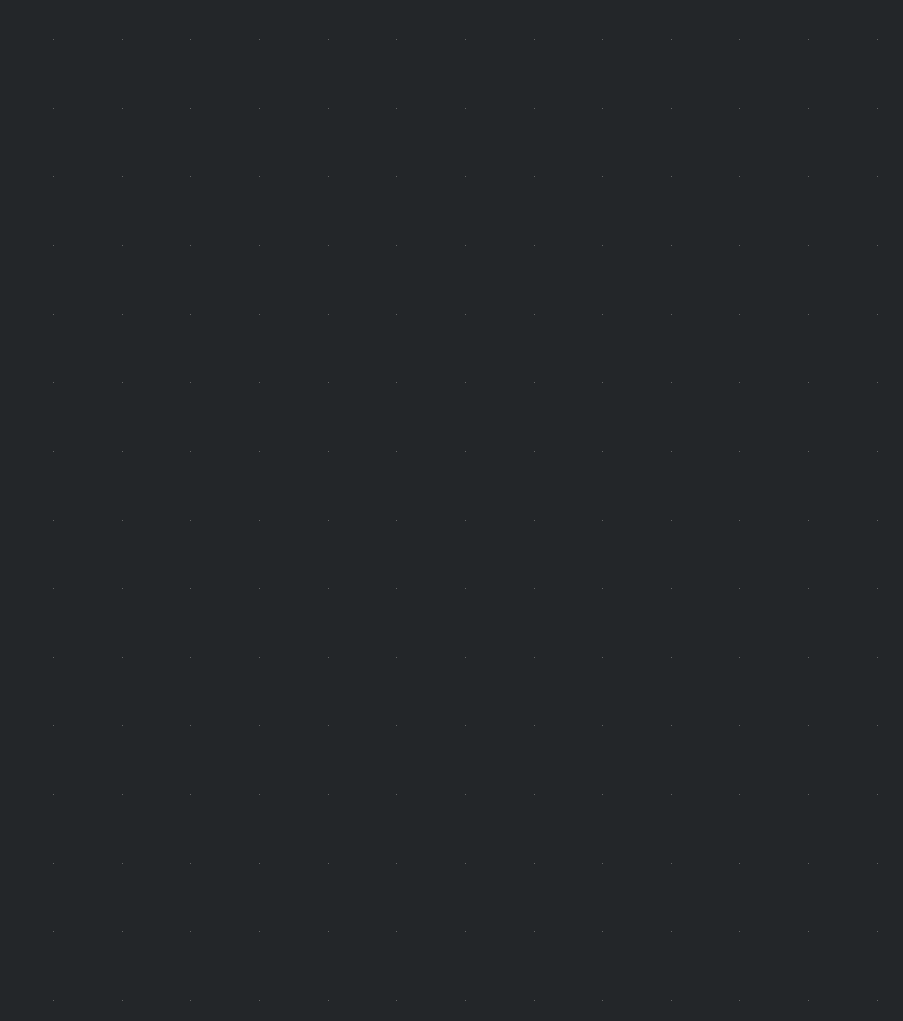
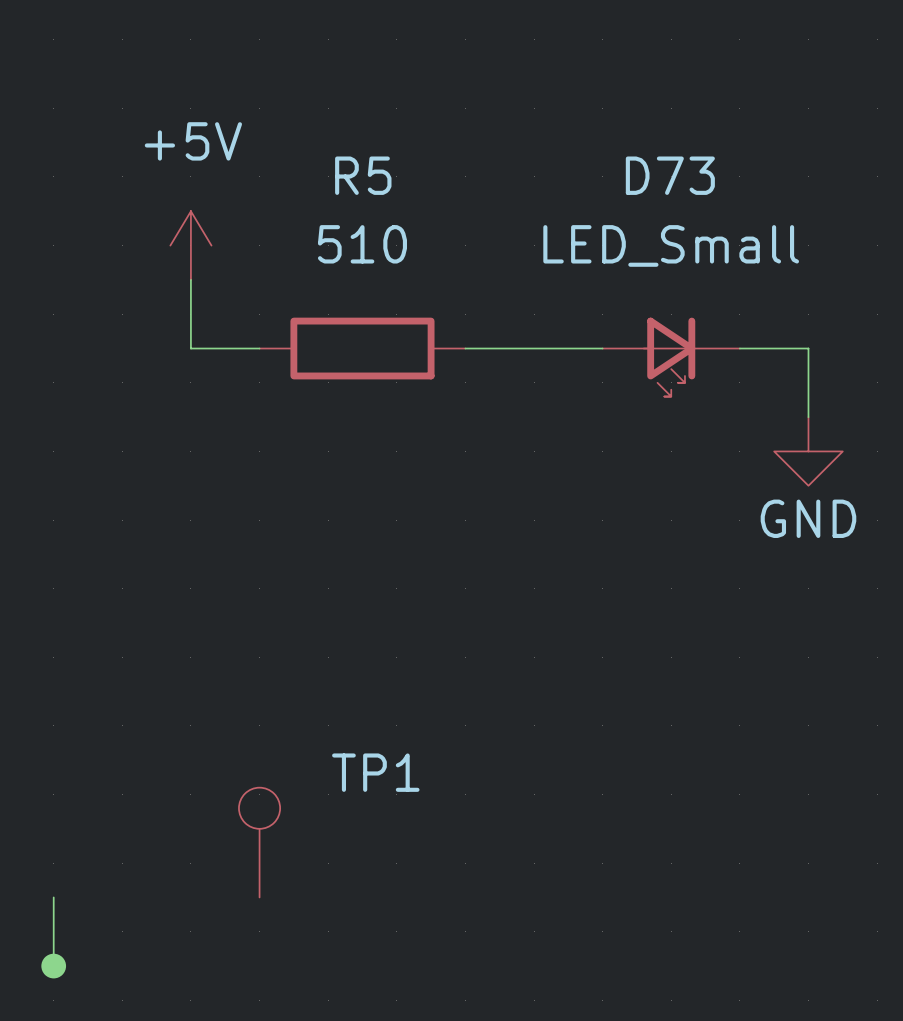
power symbol: none -> +5V (190, 245)
wire: none -> (190, 279) (190, 348) (259, 348)
R5: none -> 510 (362, 348)
wire: none -> (465, 348) (602, 348)
wire: none -> (739, 348) (808, 348) (808, 417)
D73: none -> LED_Small (671, 357)
power symbol: none -> GND (808, 451)
TP1: none -> (259, 842)
wire: none -> (53, 897) (53, 966)
junction: none -> (53, 966)

